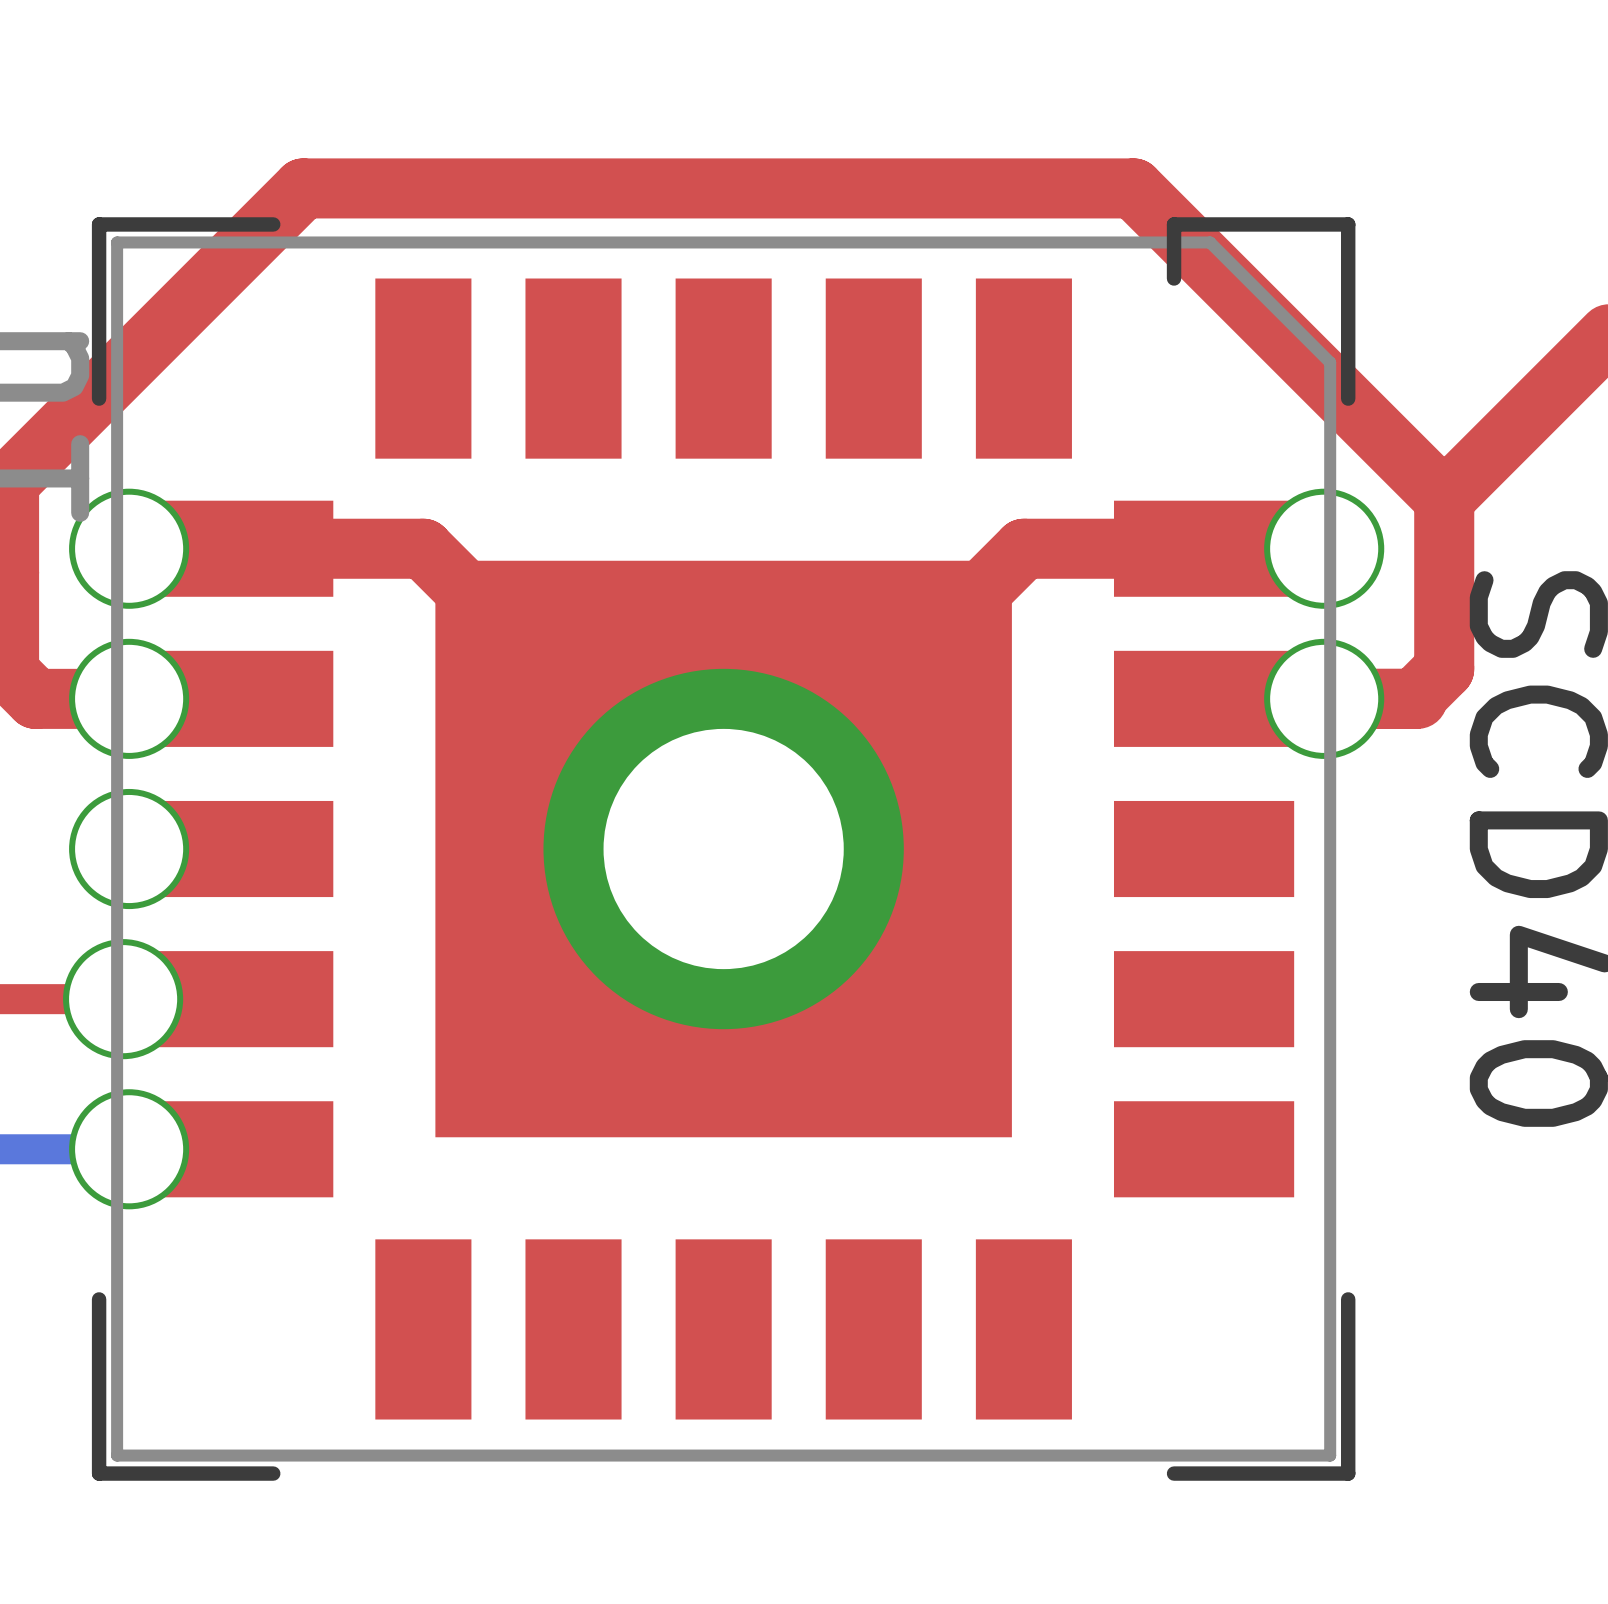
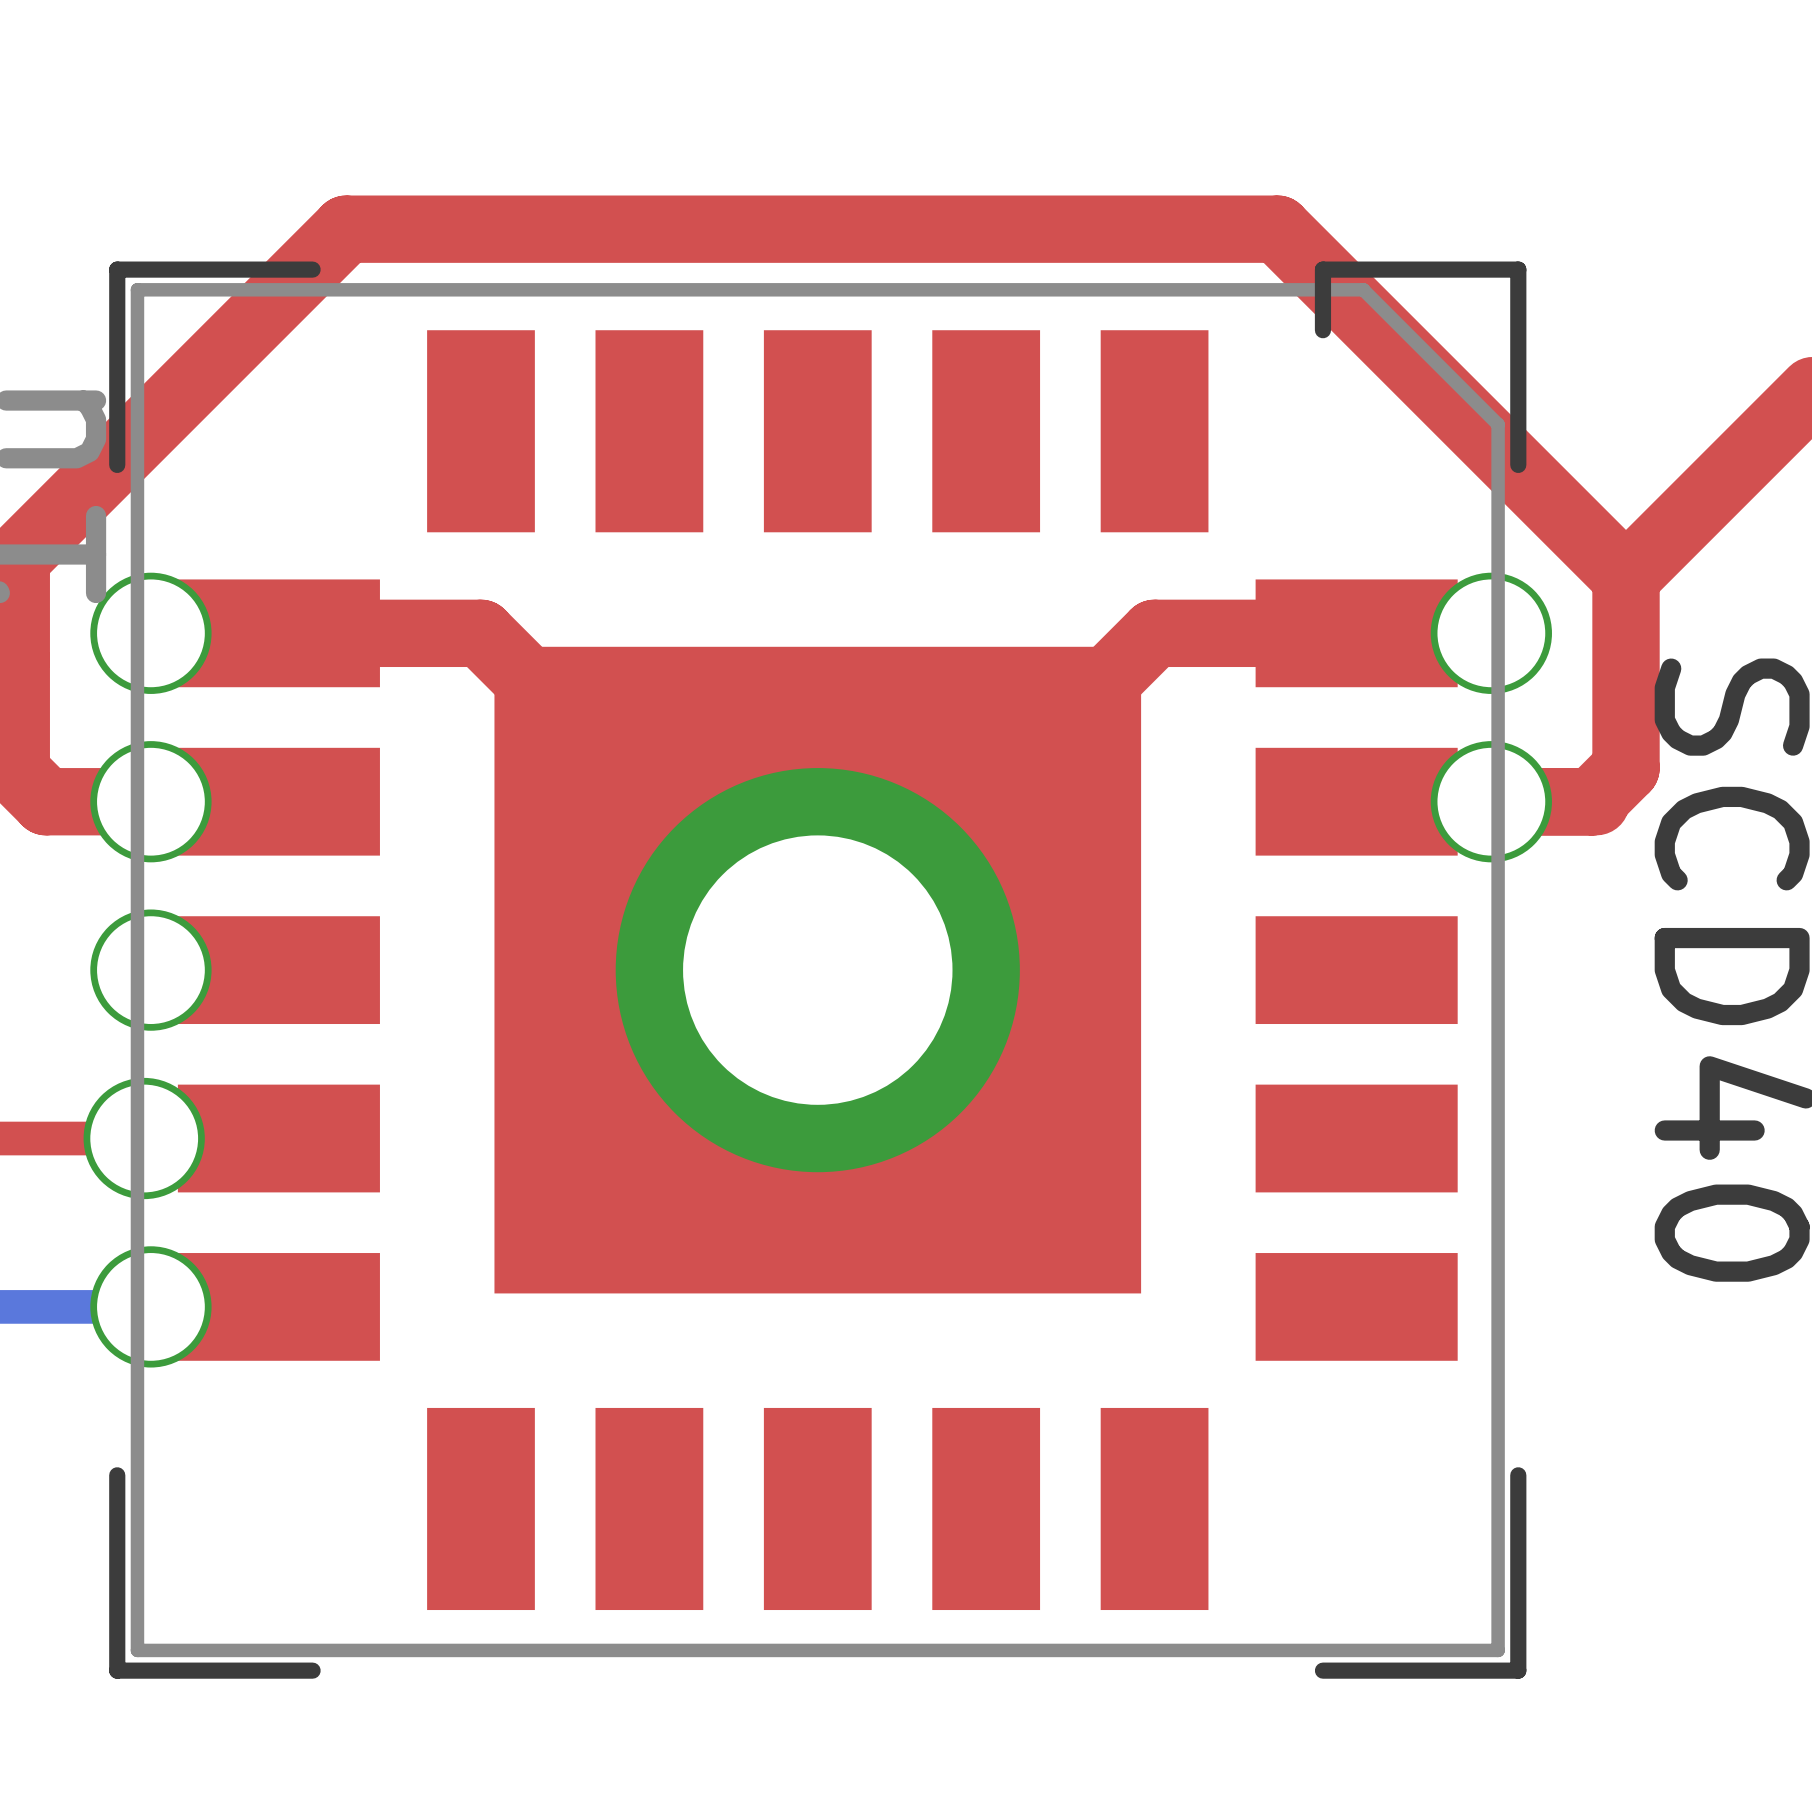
part footprint: [63, 217, 1385, 1481] -> [83, 261, 1552, 1679]

